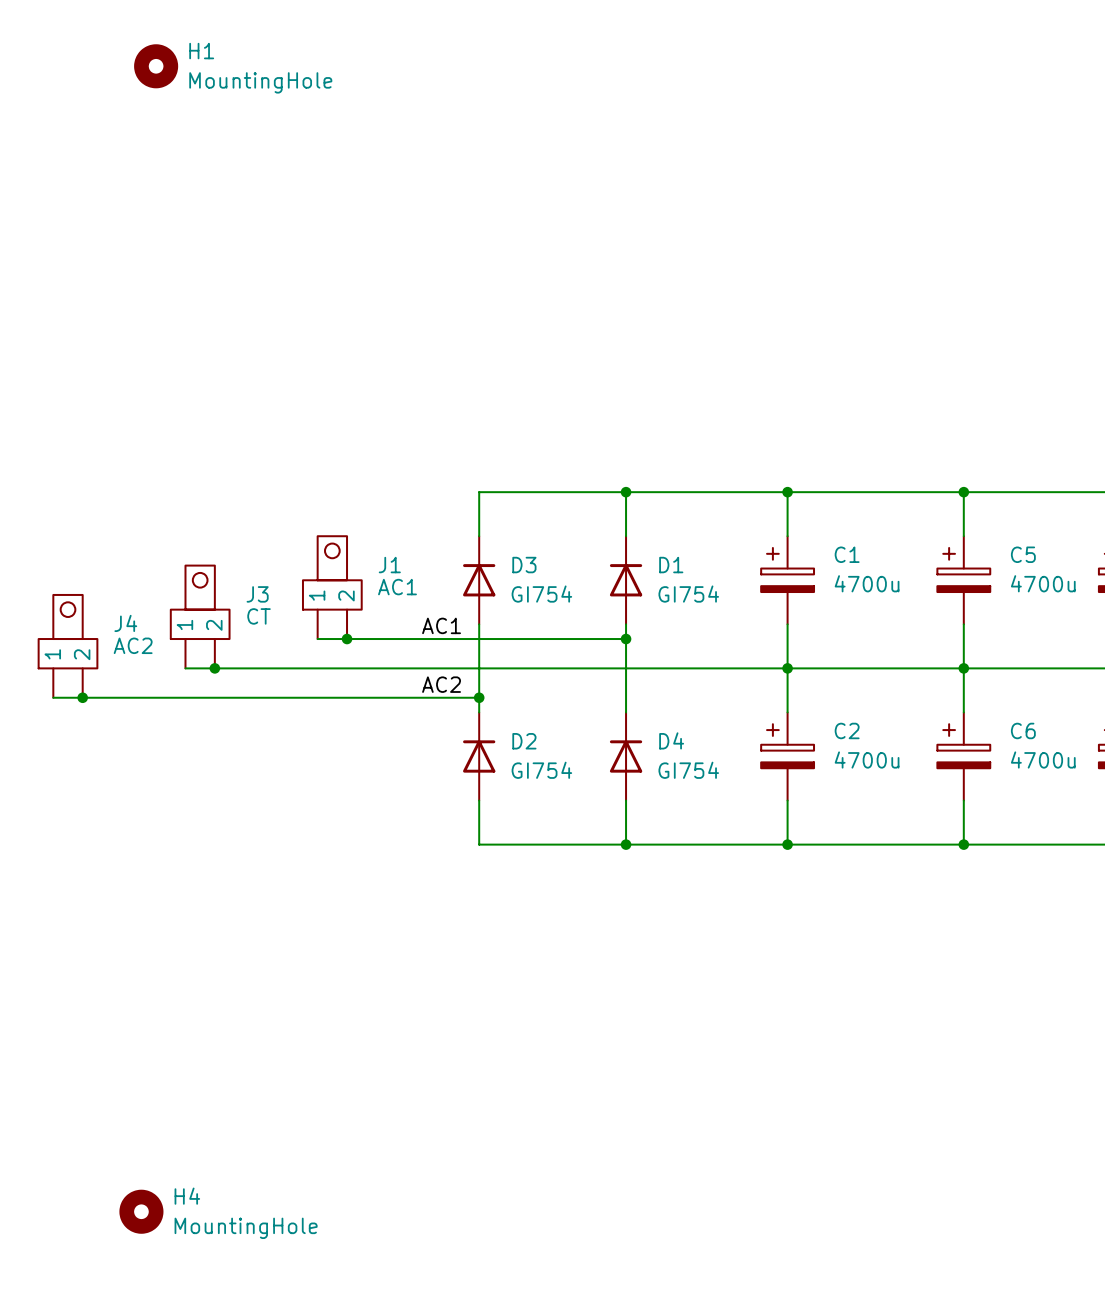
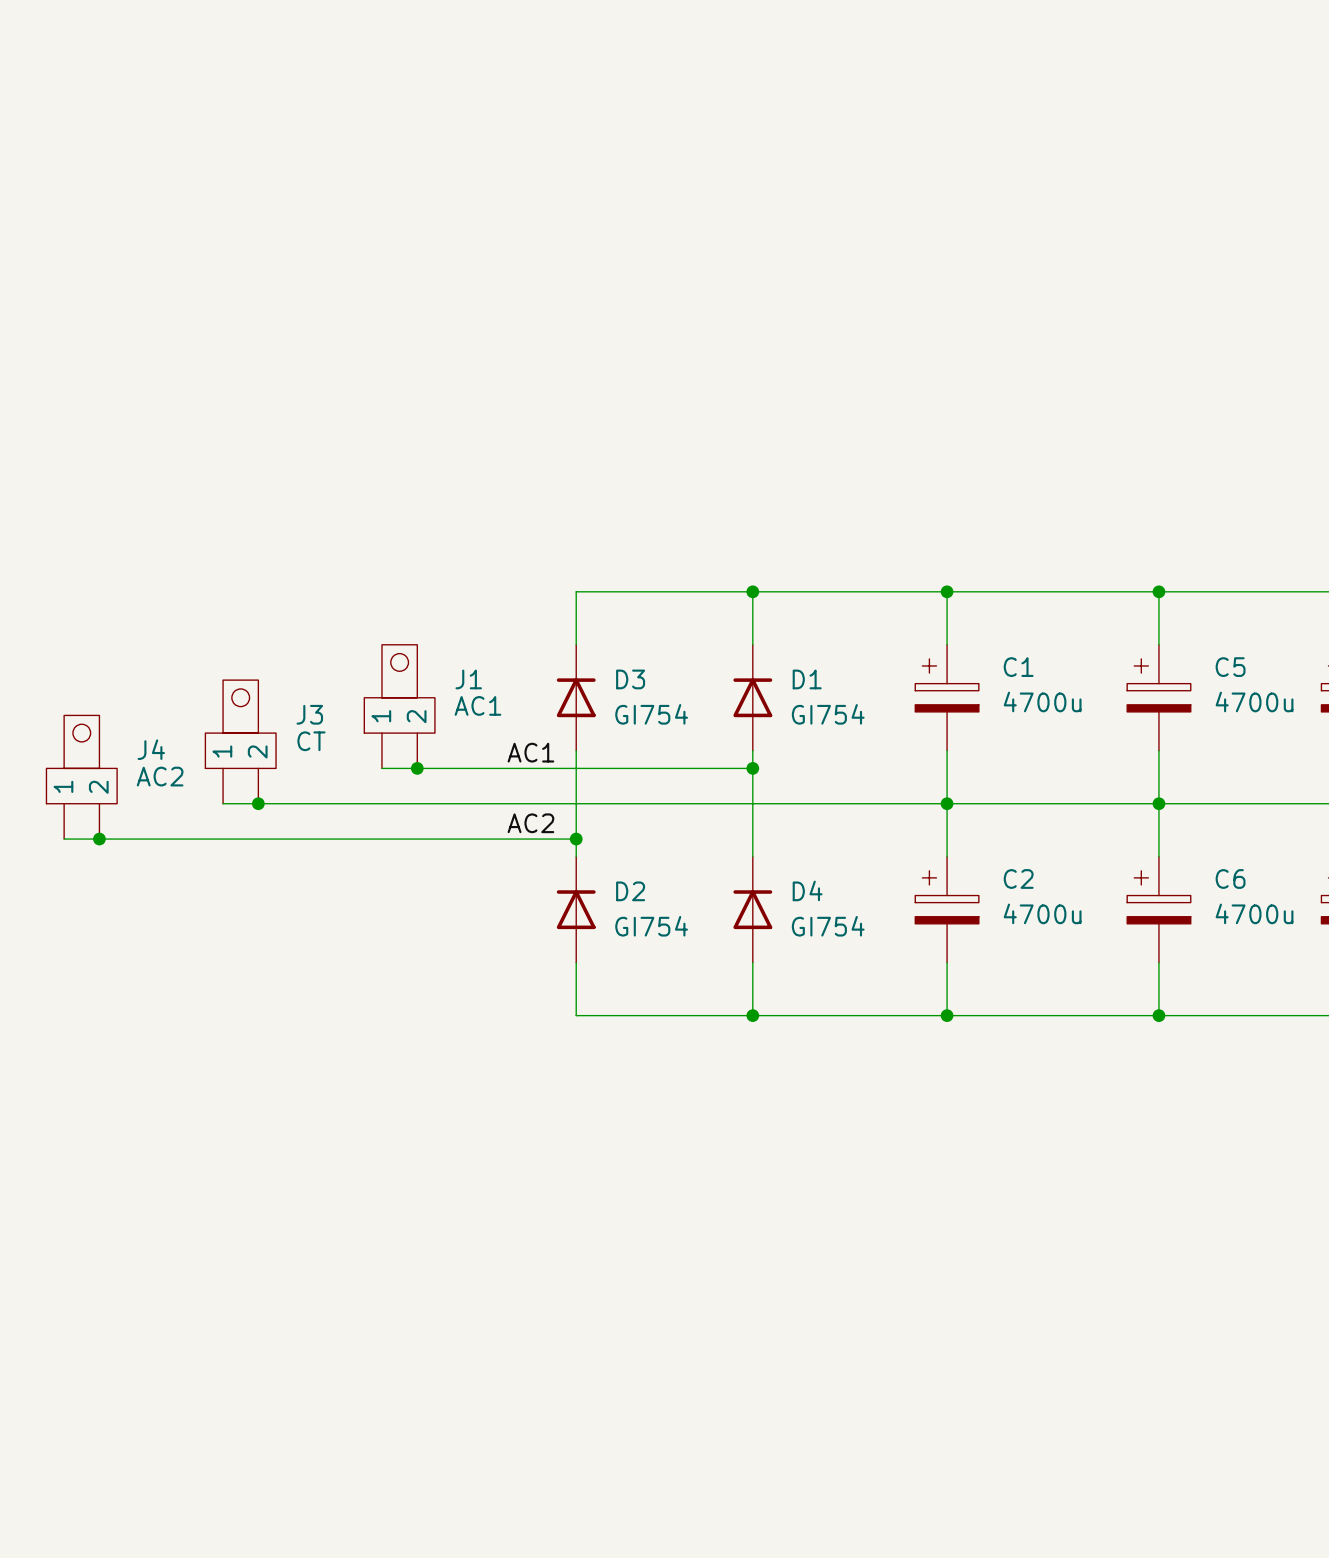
H1: MountingHole (156, 66) -> none
H4: MountingHole (141, 1211) -> none

